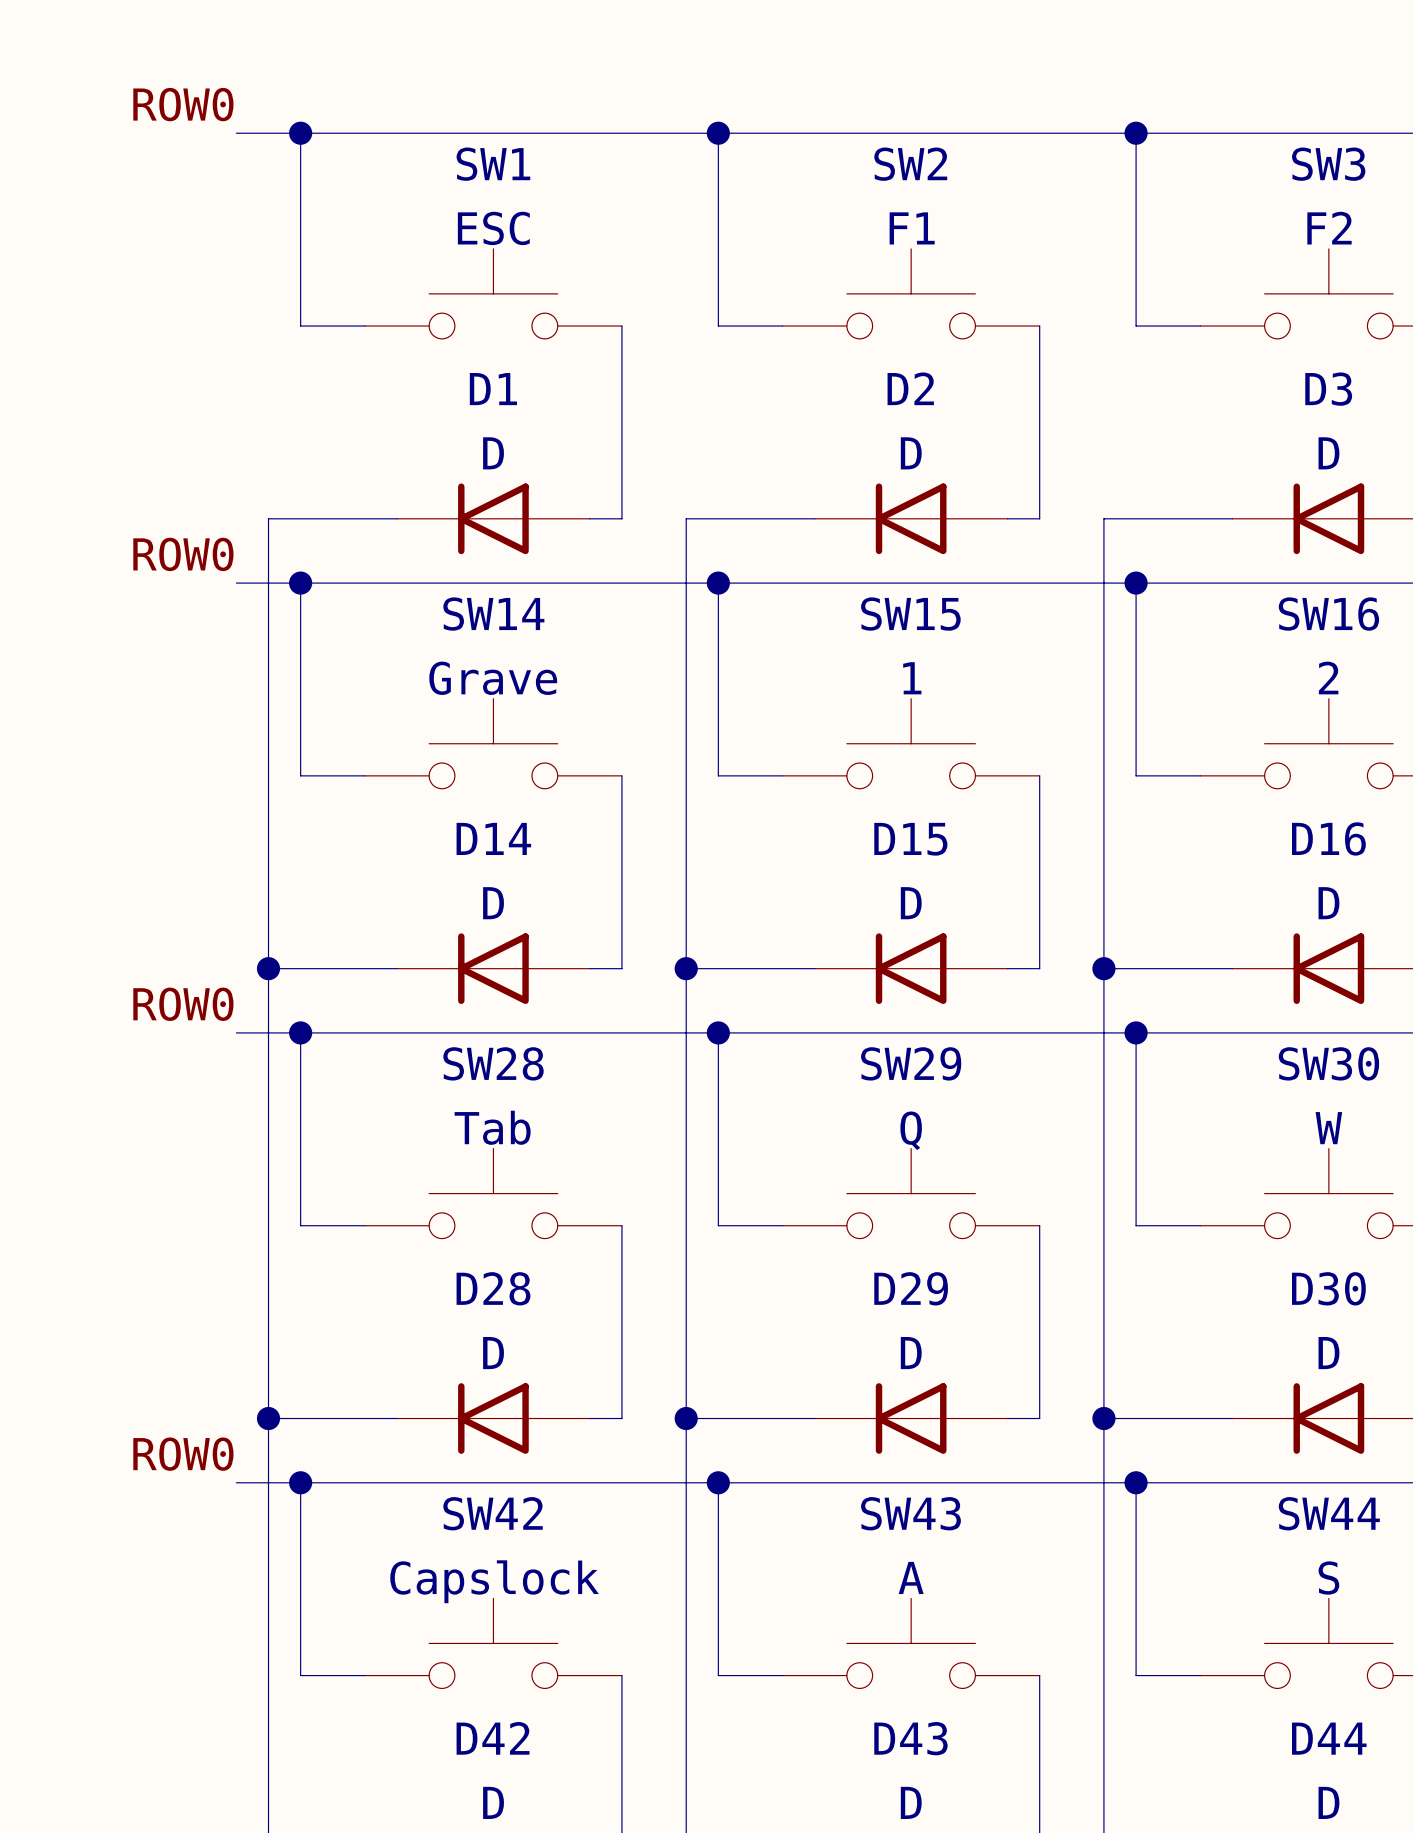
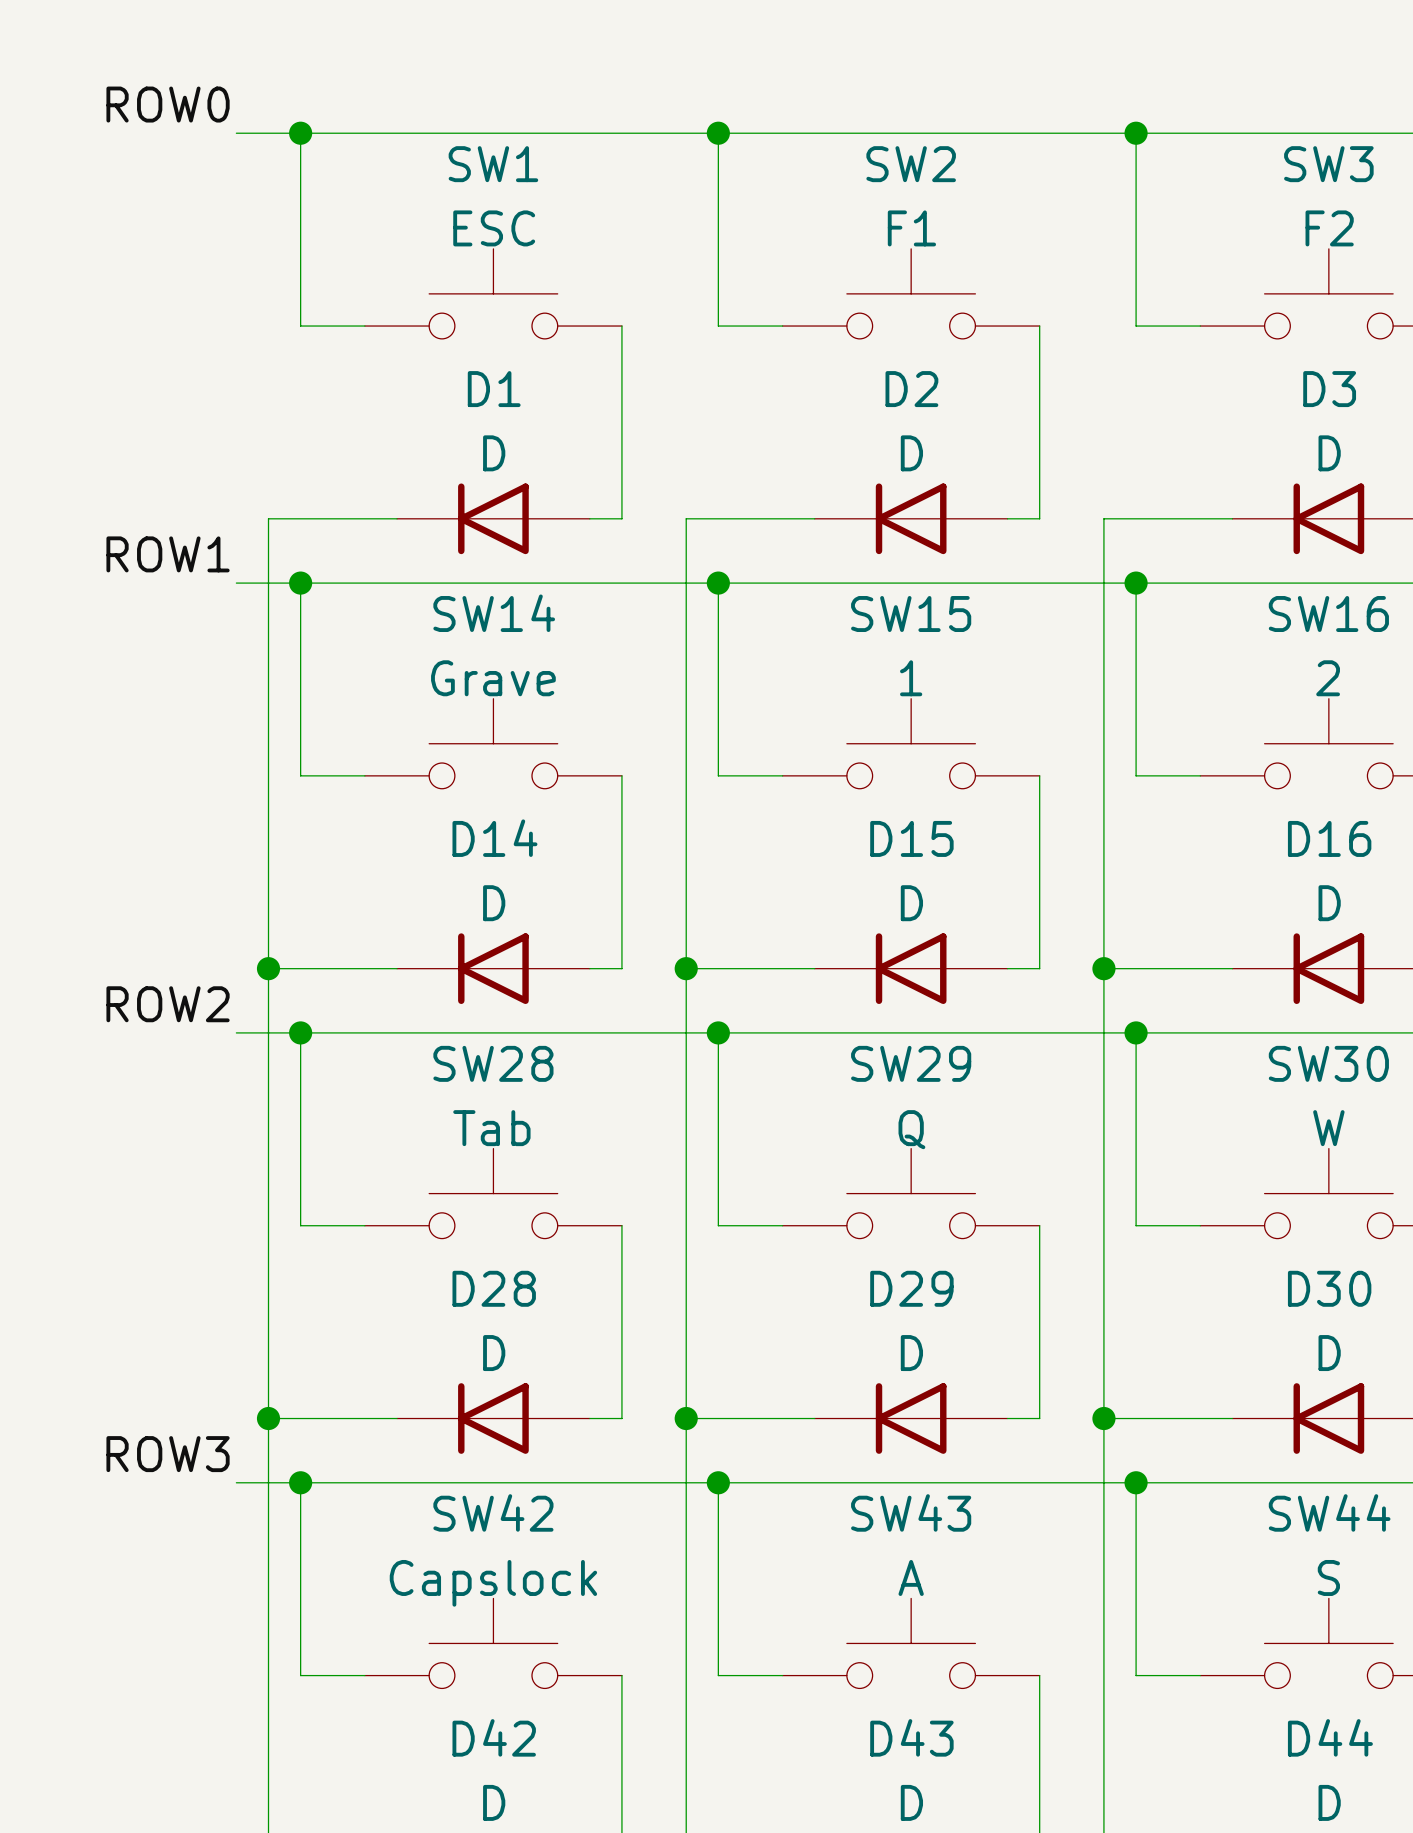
label: ROW0 (183, 554) -> ROW1 (168, 554)
label: ROW0 (183, 1004) -> ROW2 (168, 1004)
label: ROW0 (183, 1454) -> ROW3 (168, 1454)

